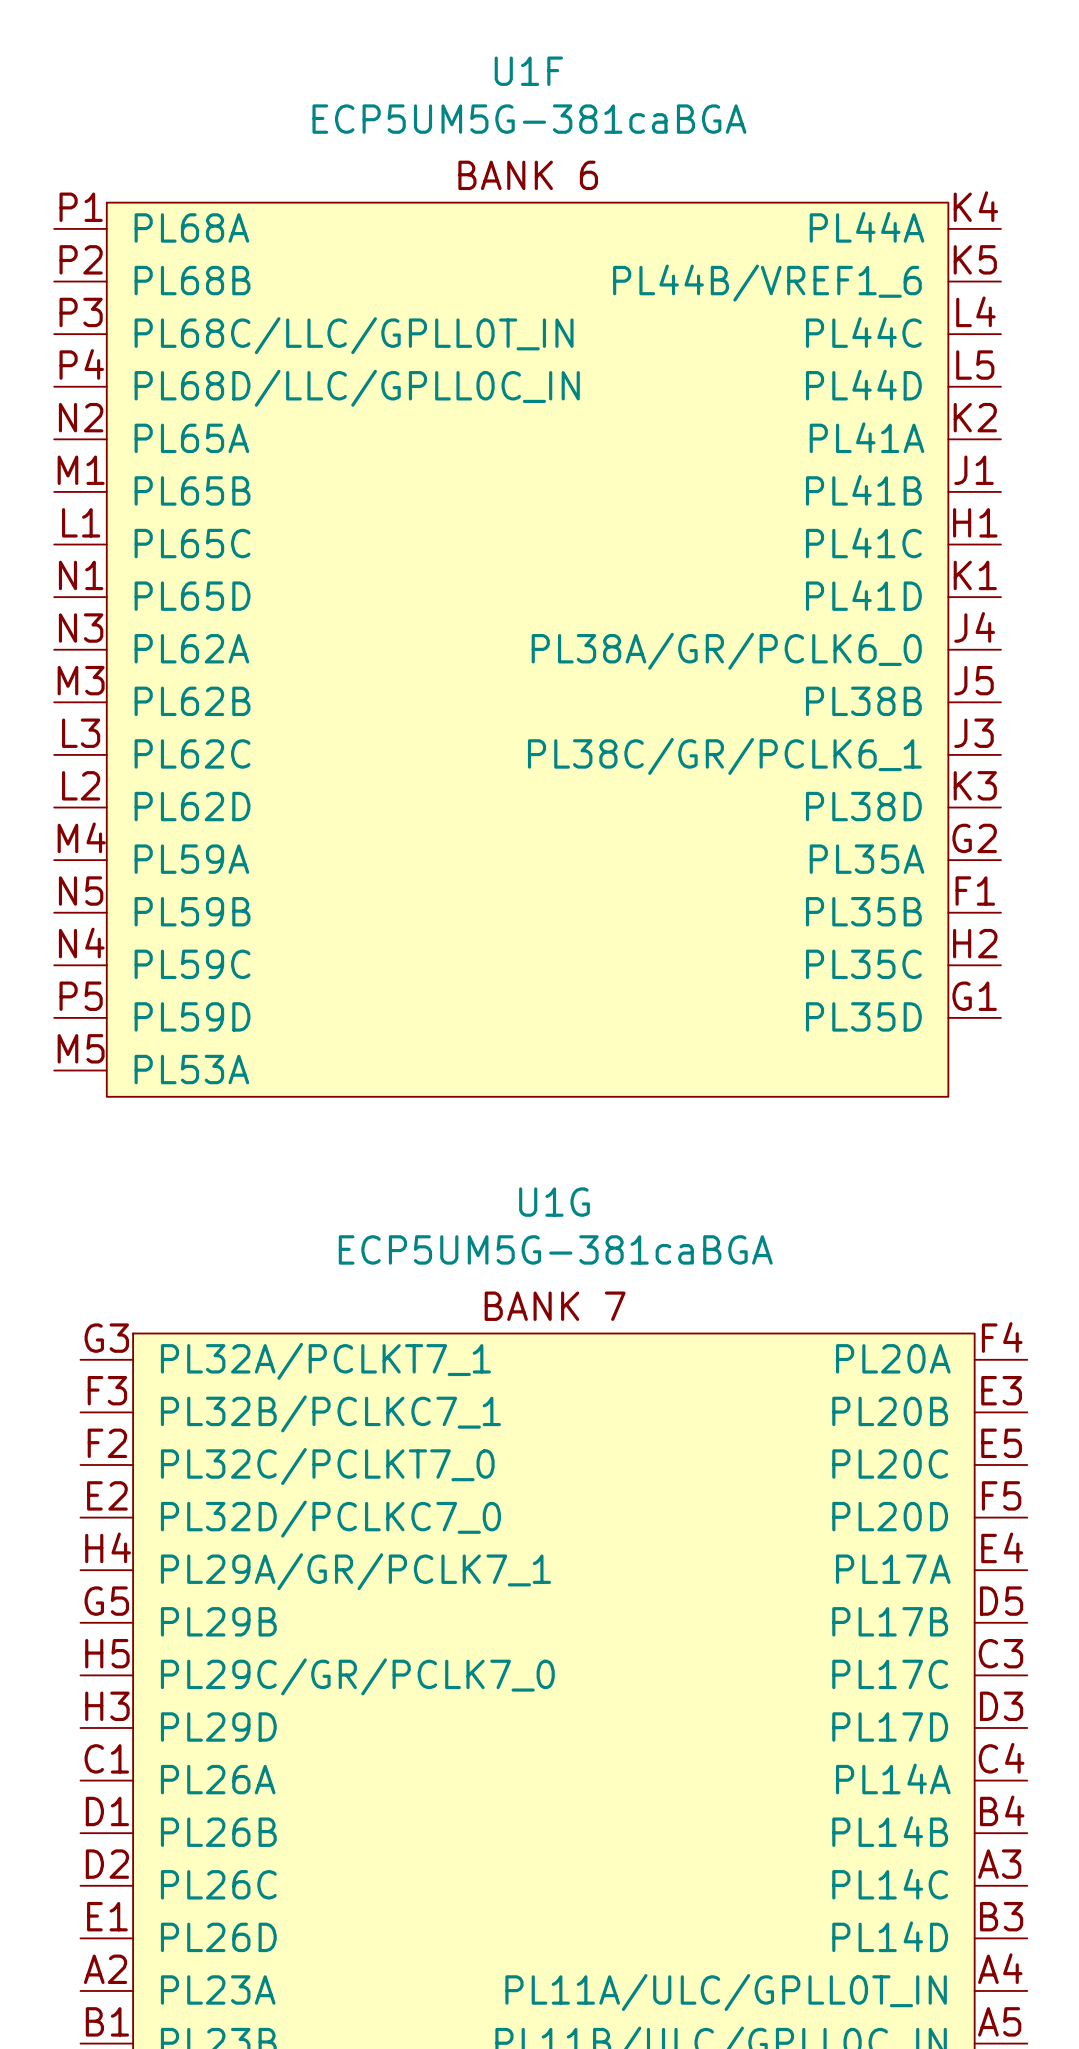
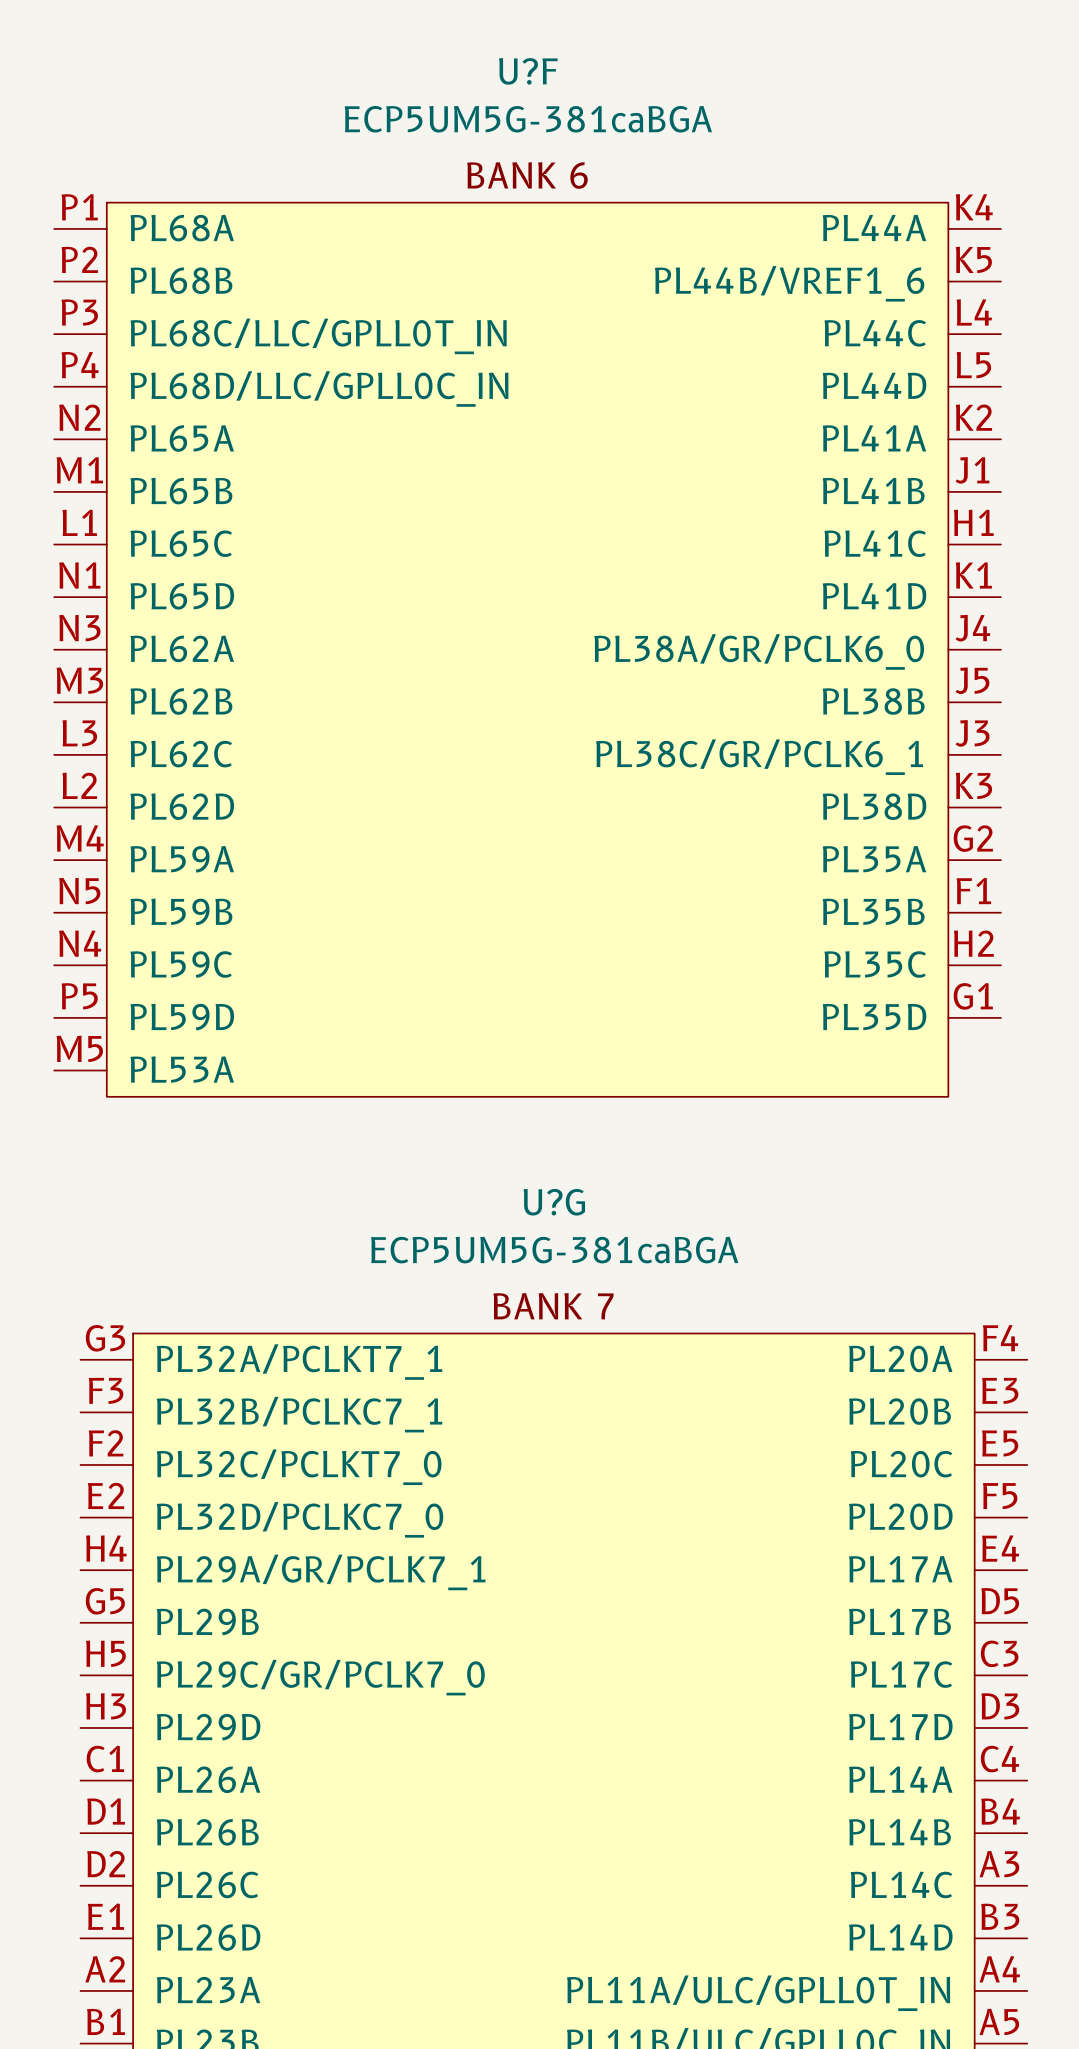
U1F name: U1F (528, 71) -> U?F (528, 71)
U1G name: U1G (554, 1202) -> U?G (554, 1202)

